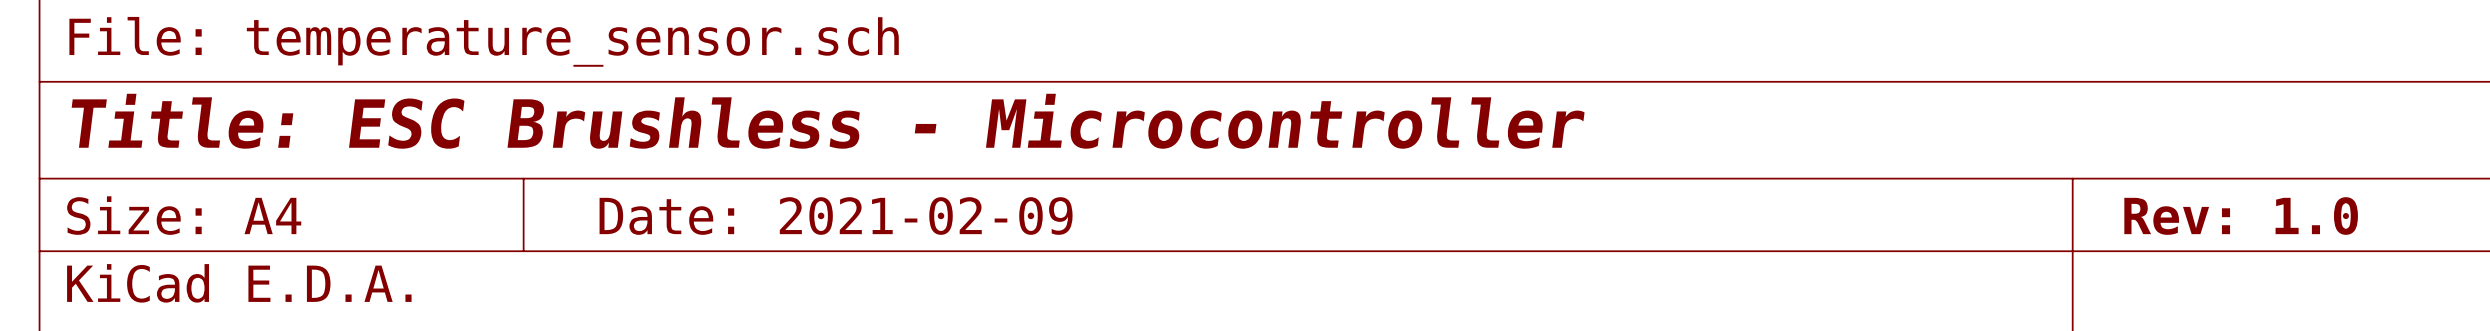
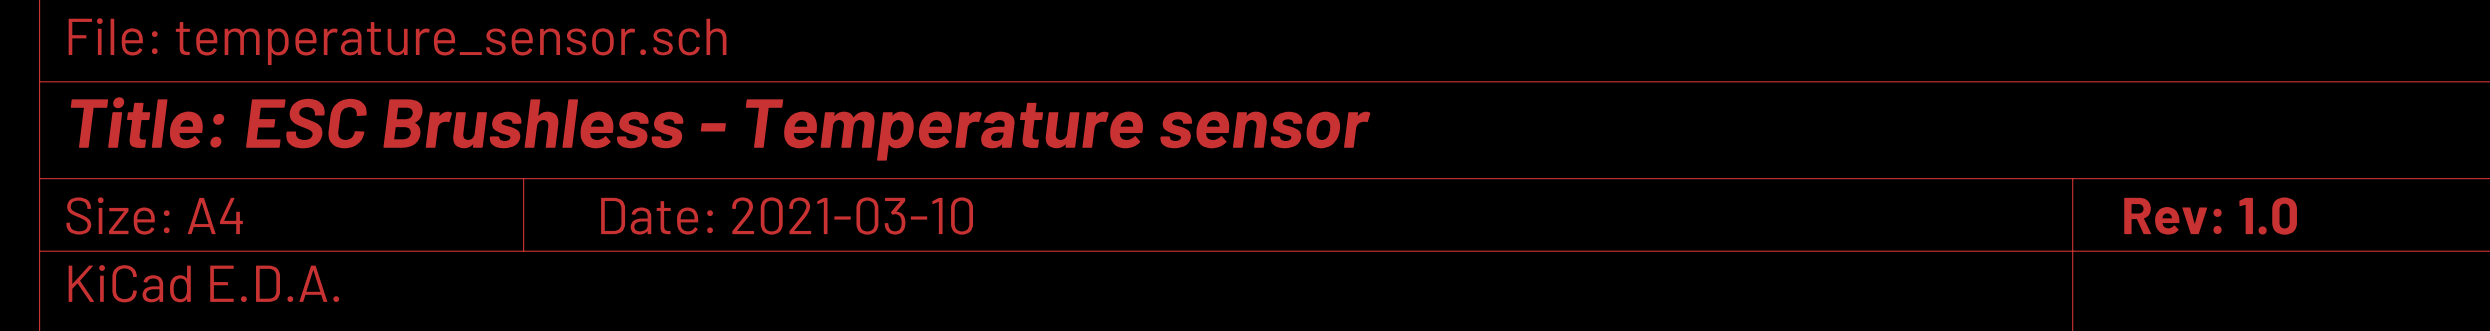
title block: Title: ESC Brushless - Microcontroller (828, 121) -> Title: ESC Brushless - Temperature sensor (720, 128)
title block: Date: 2021-02-09 (836, 216) -> Date: 2021-03-10 (787, 216)

